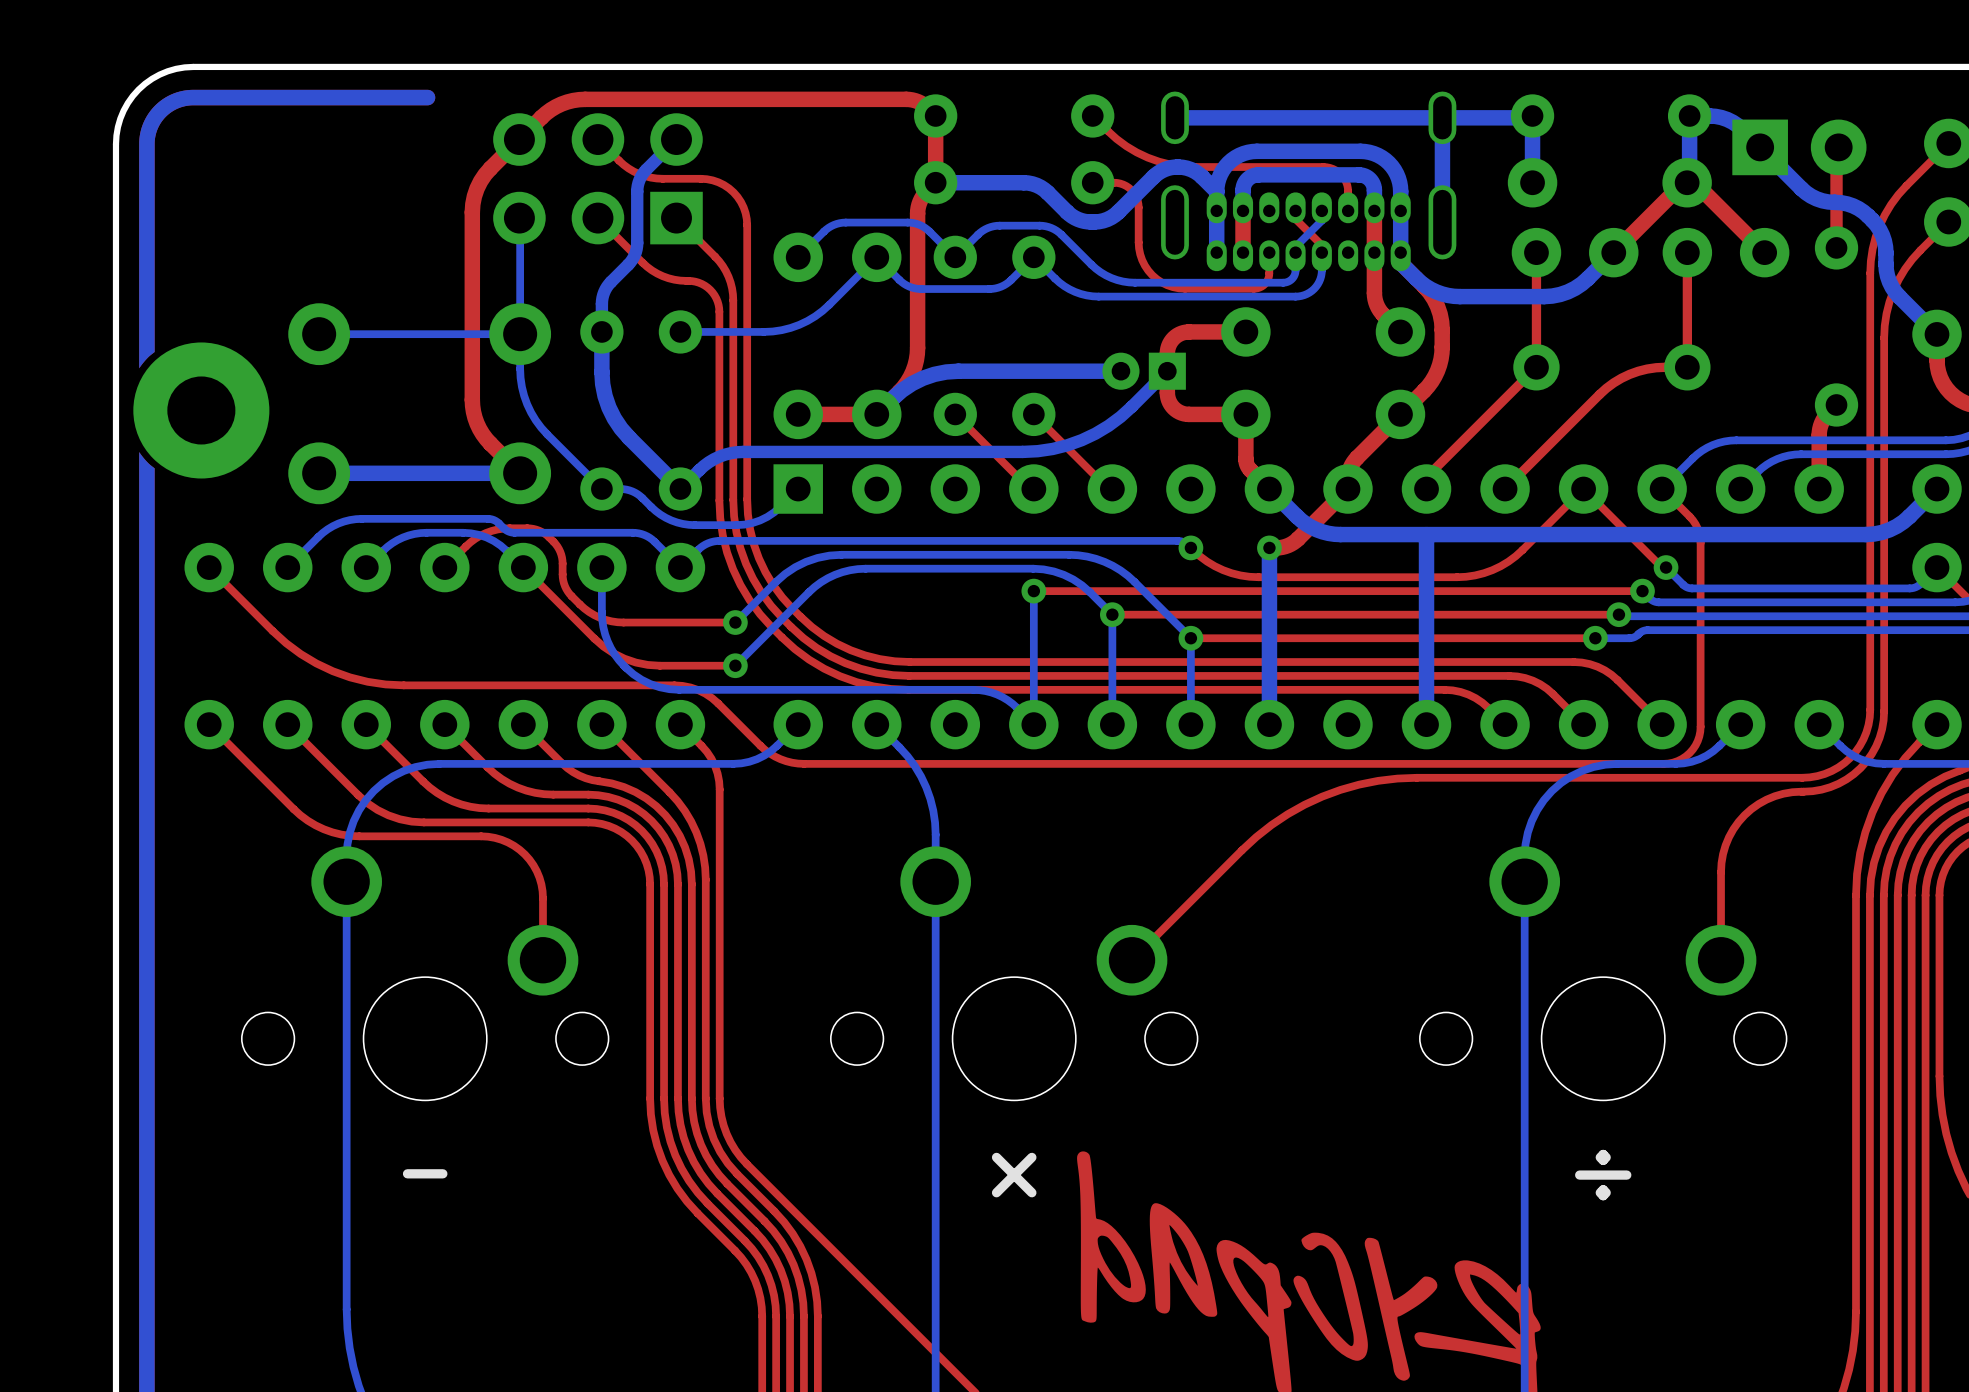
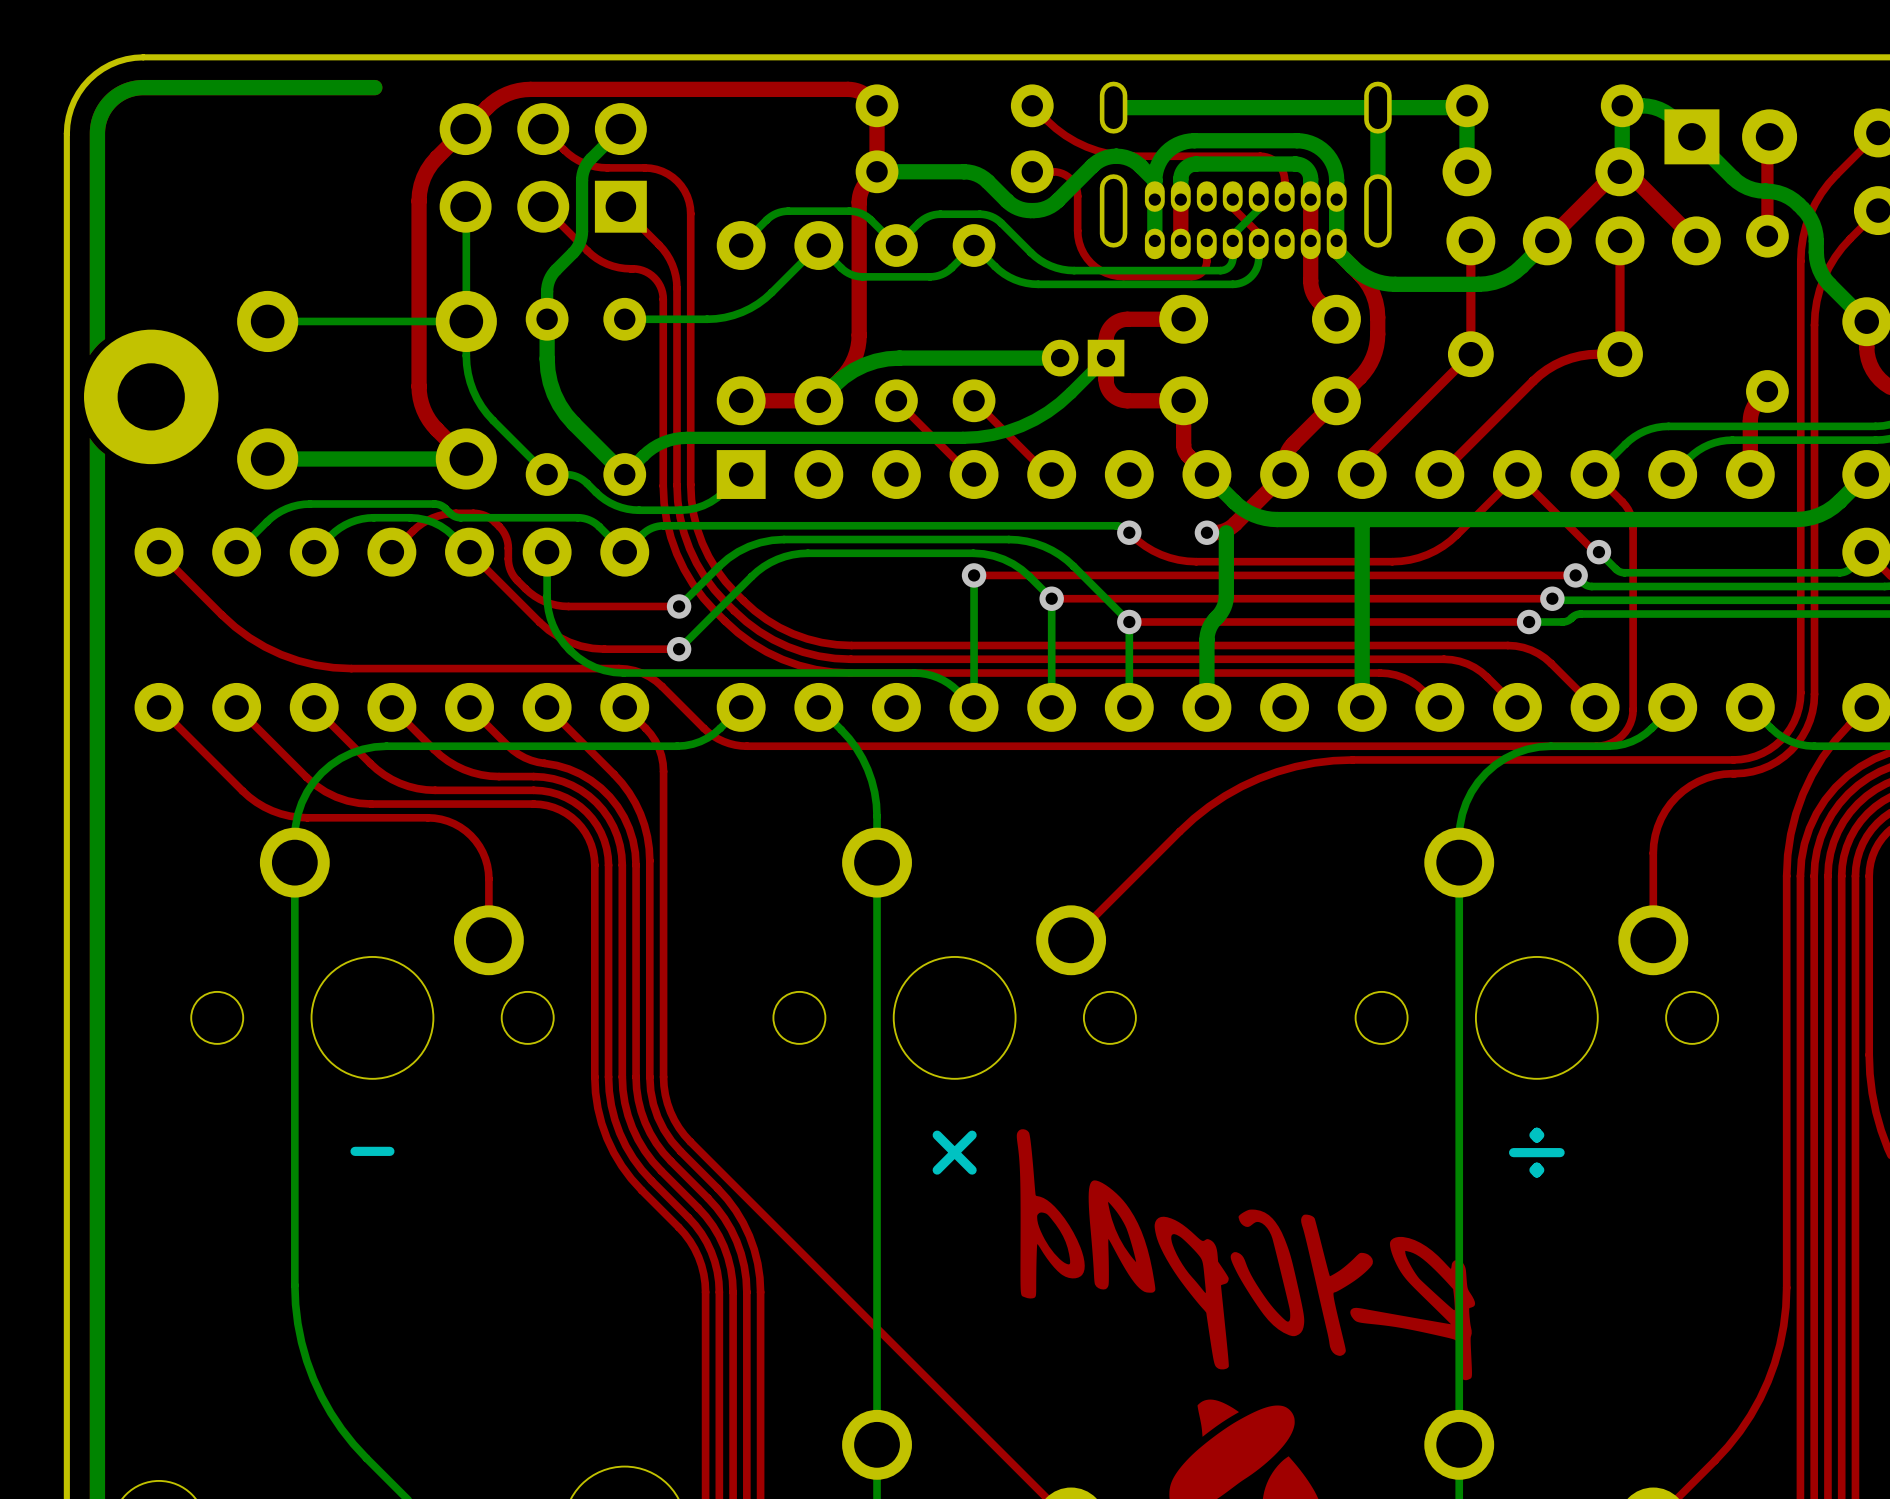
bottom track: (1269, 547) (1269, 656) -> (1226, 532) (1225, 601) (1221, 612) (1210, 625) (1206, 640)

